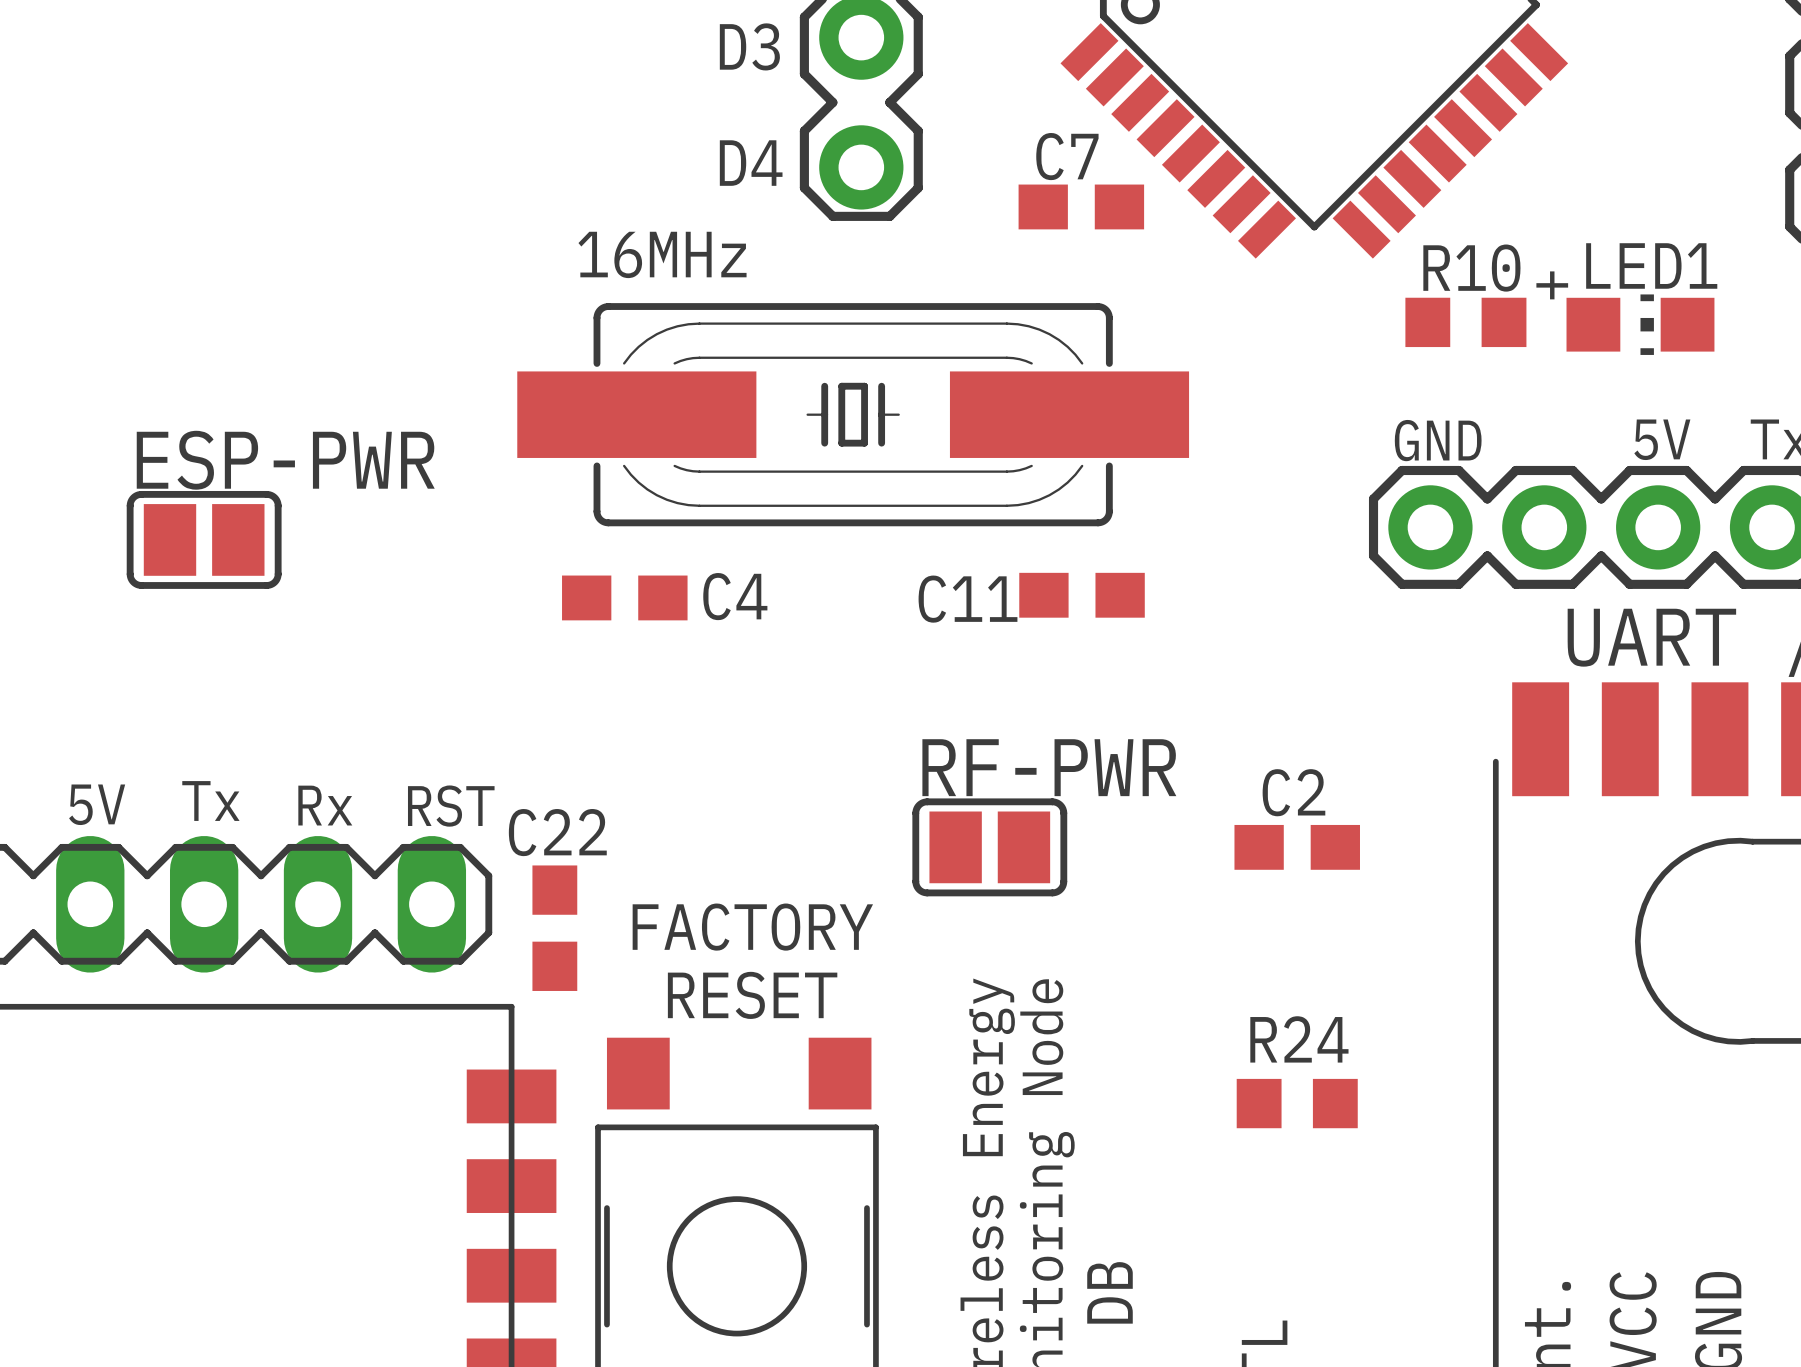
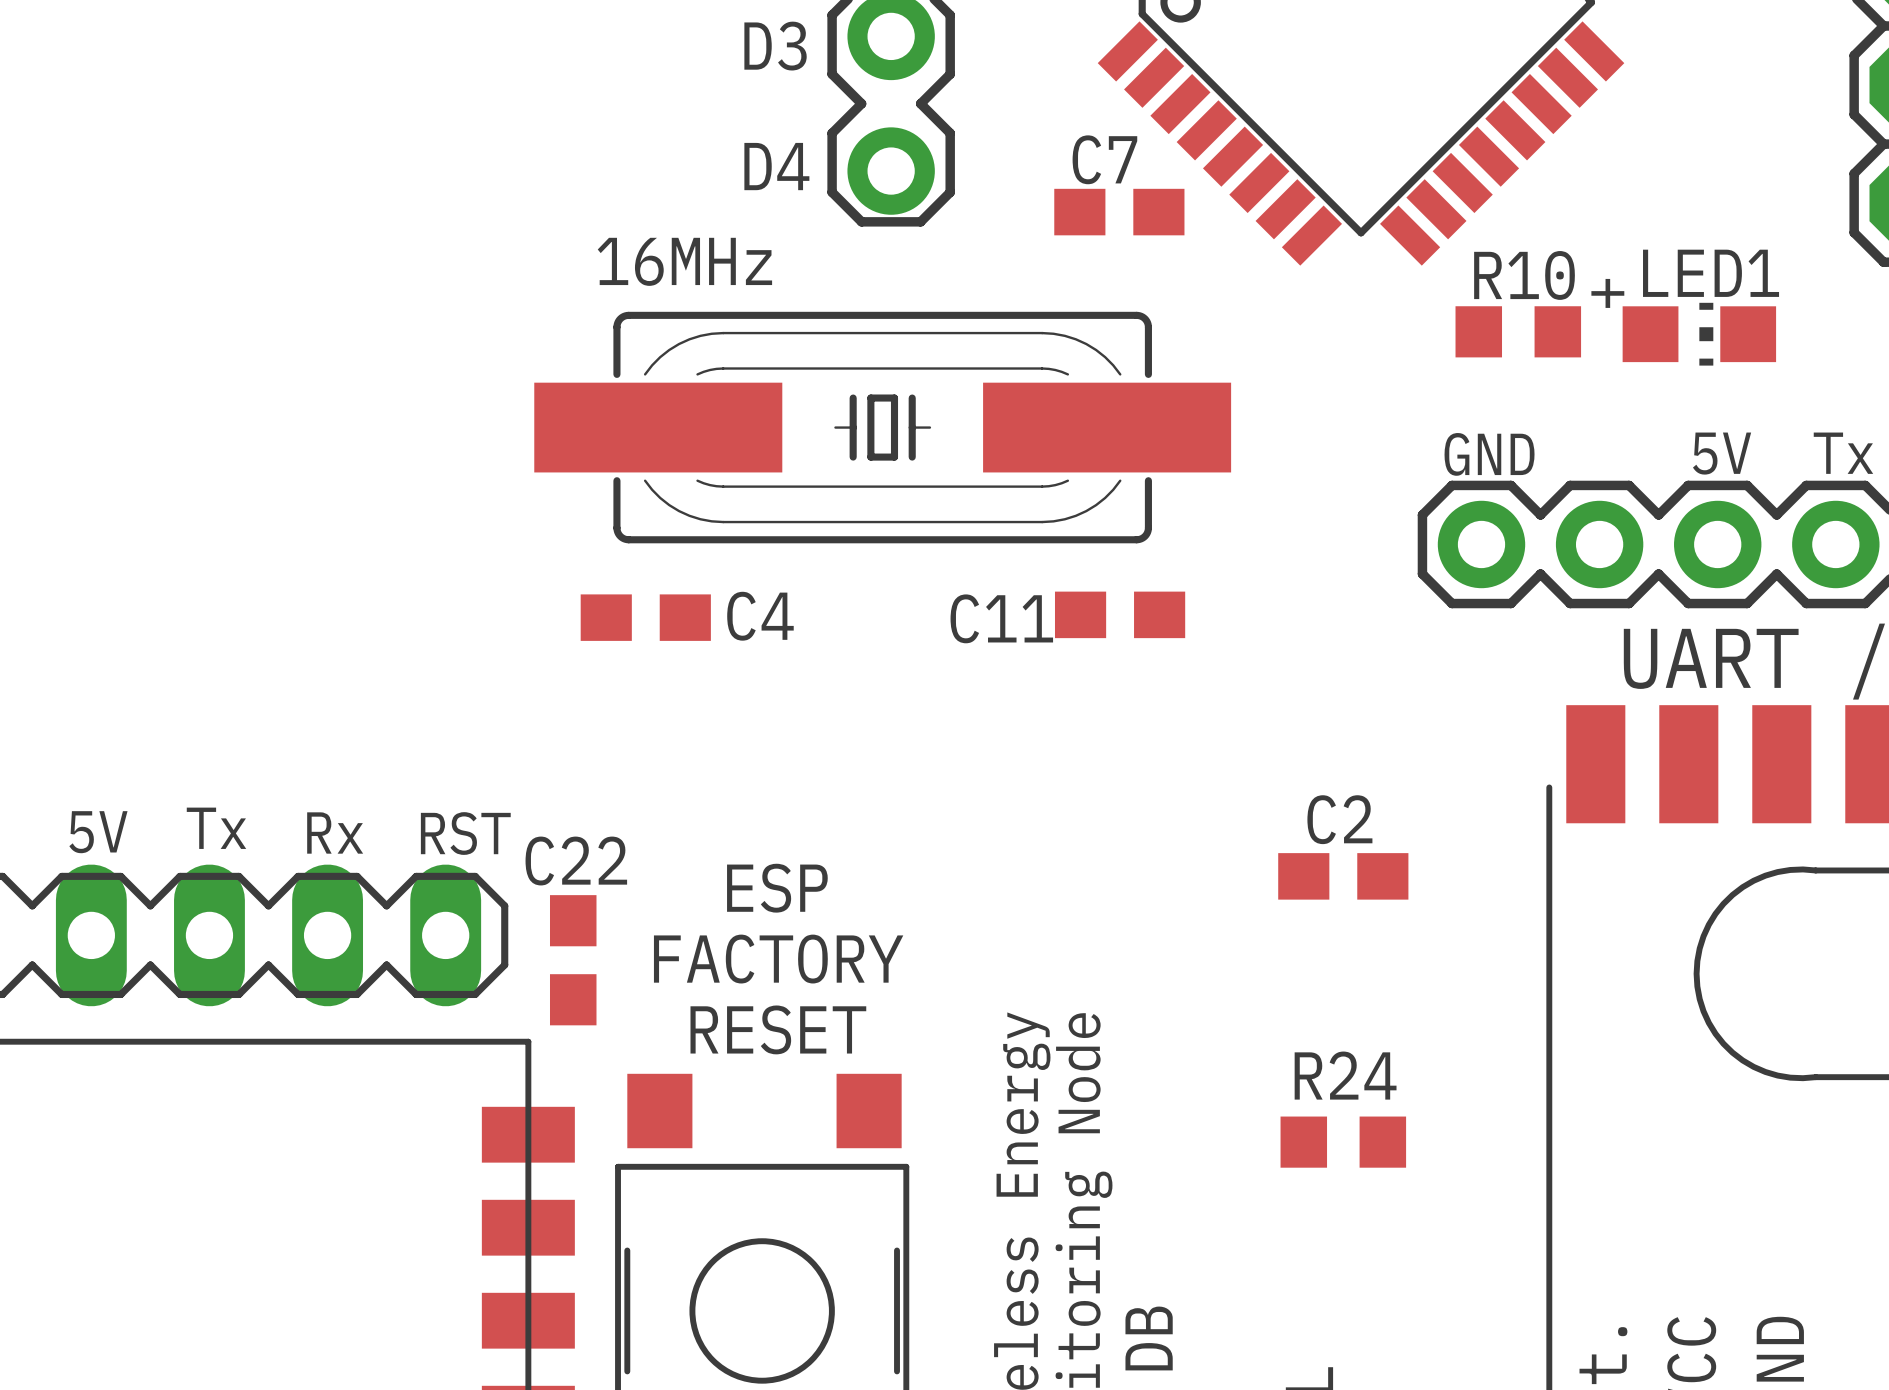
ESP-PWR: (204, 539) -> none
RF-PWR: (989, 847) -> none
text: none -> ESP (777, 888)

